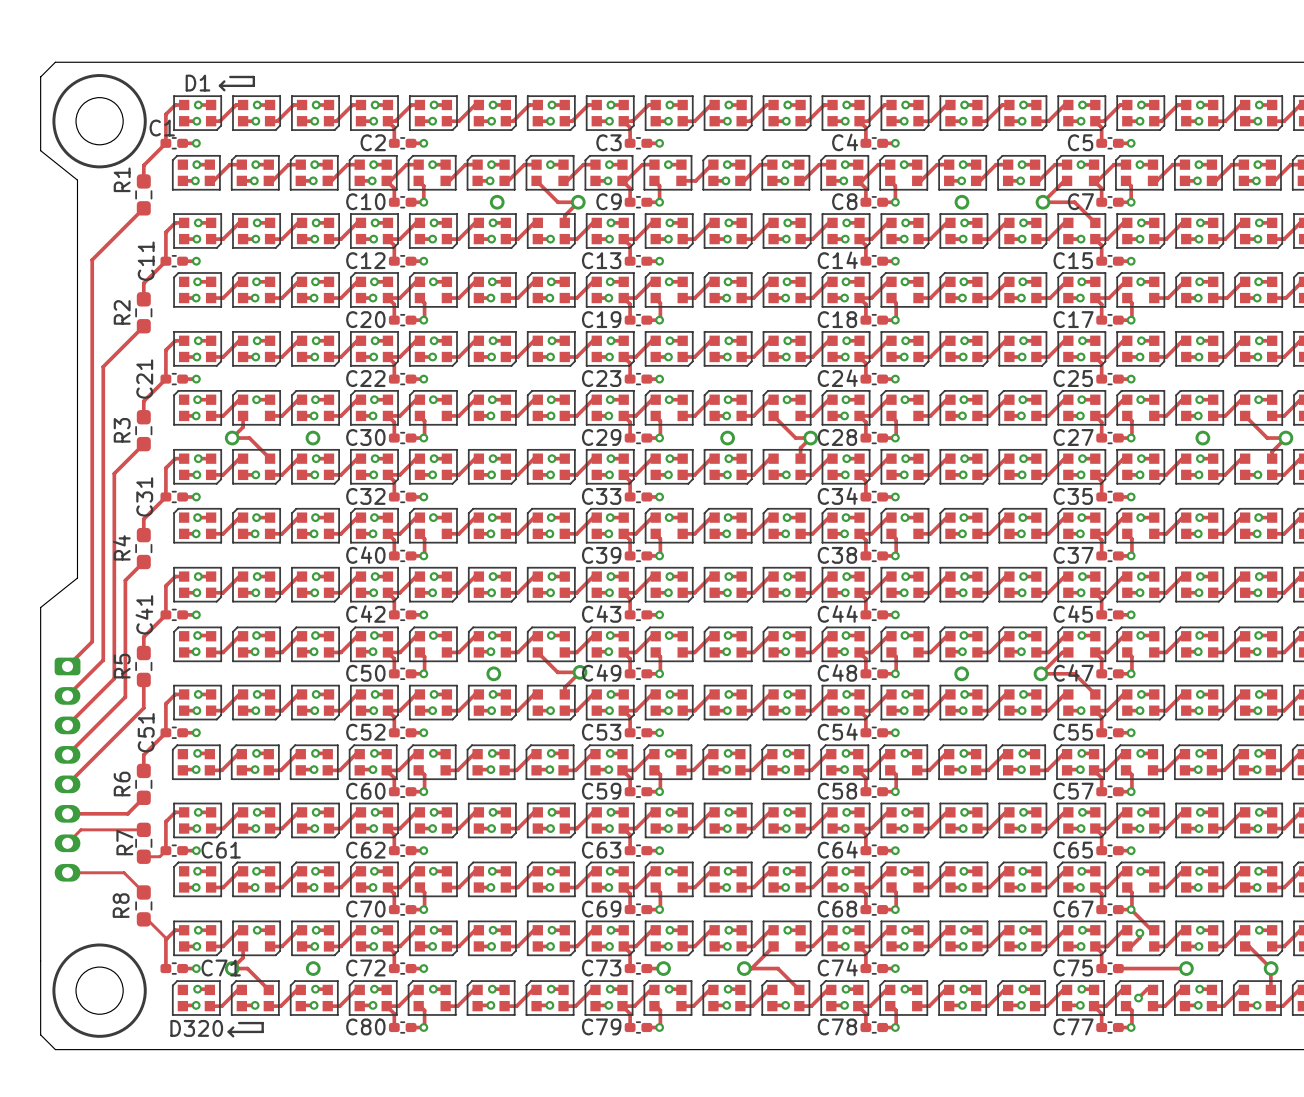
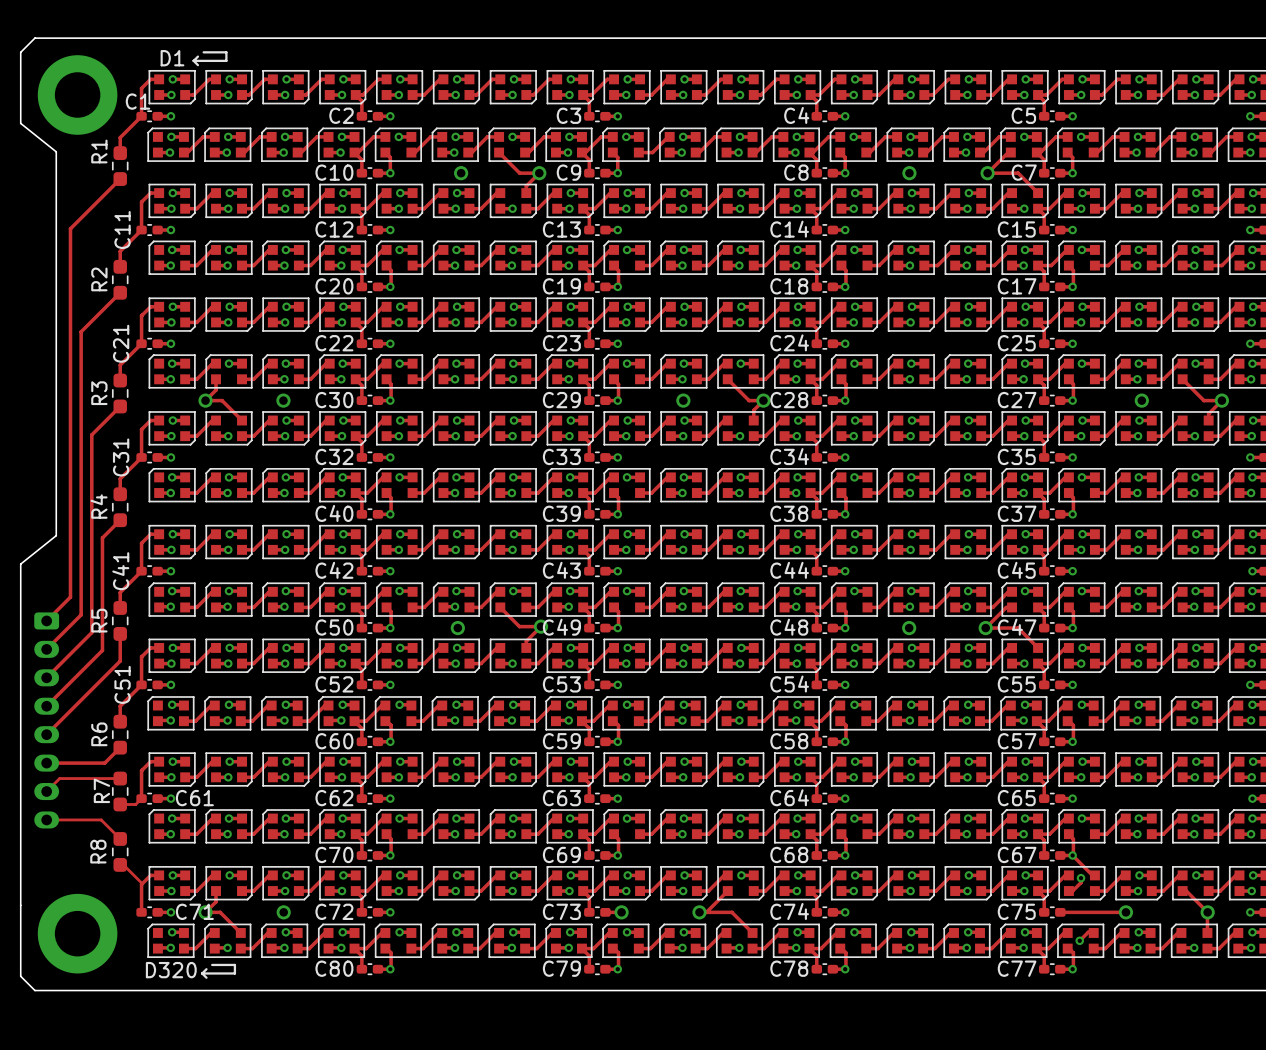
drawing: [52, 74, 147, 169] -> none
round board edge: [75, 97, 124, 146] -> none
part: none -> (77, 94)
drawing: [52, 943, 147, 1038] -> none
round board edge: [75, 966, 124, 1015] -> none
part: none -> (77, 933)

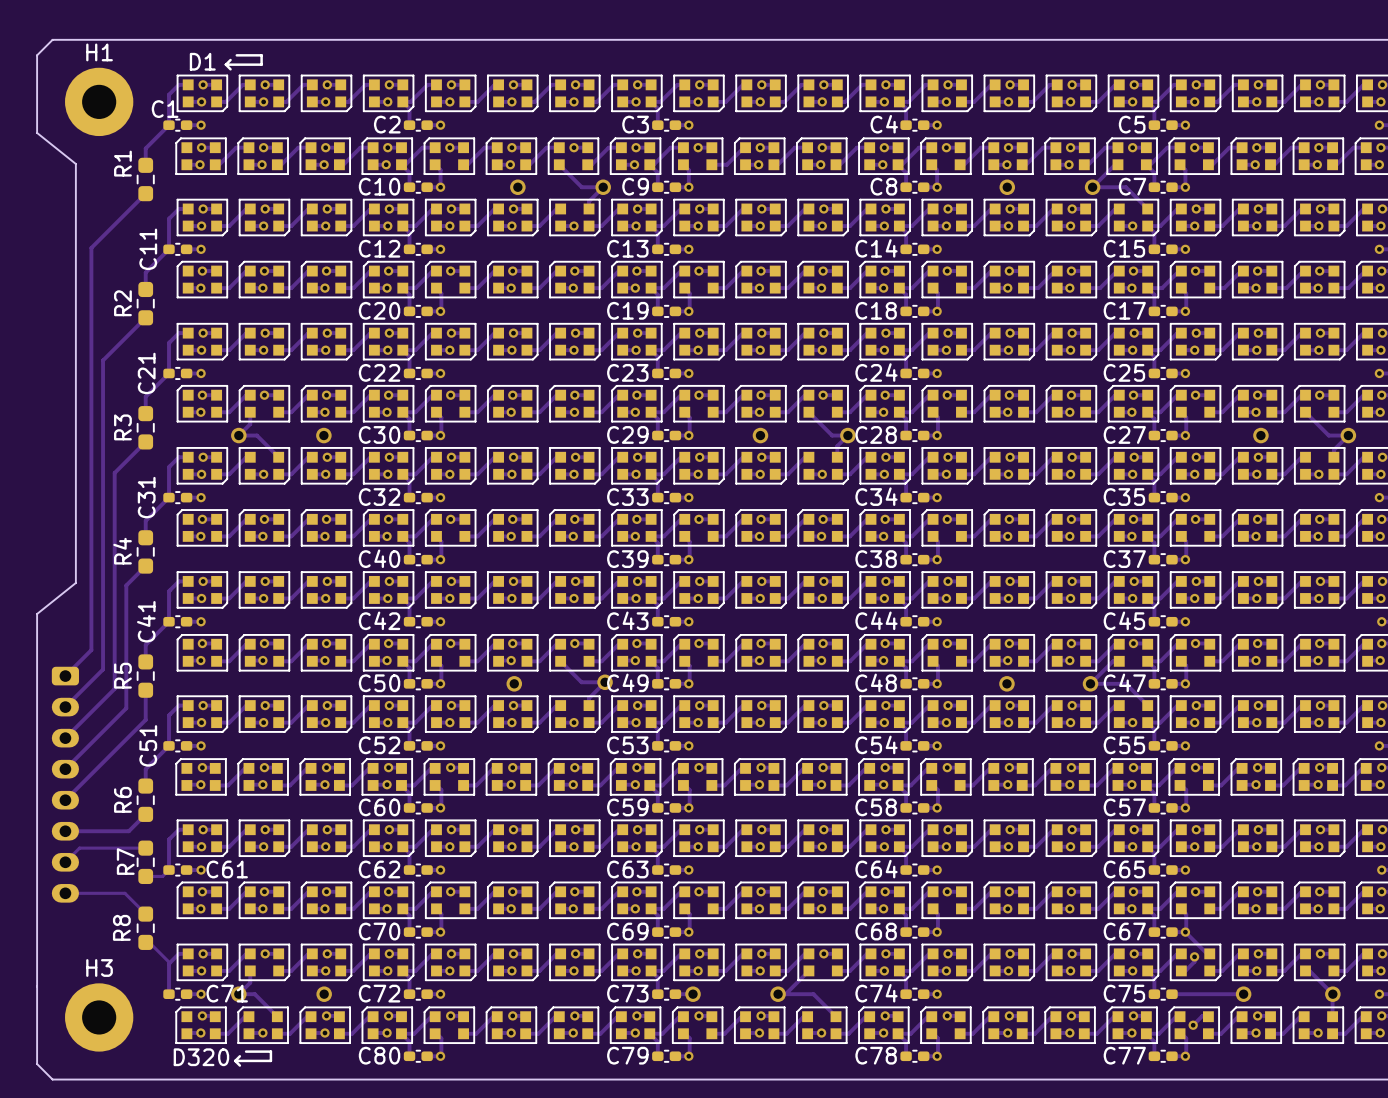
part: (77, 94) -> none
H1: none -> (99, 101)
part: (77, 933) -> none
H3: none -> (99, 1017)

